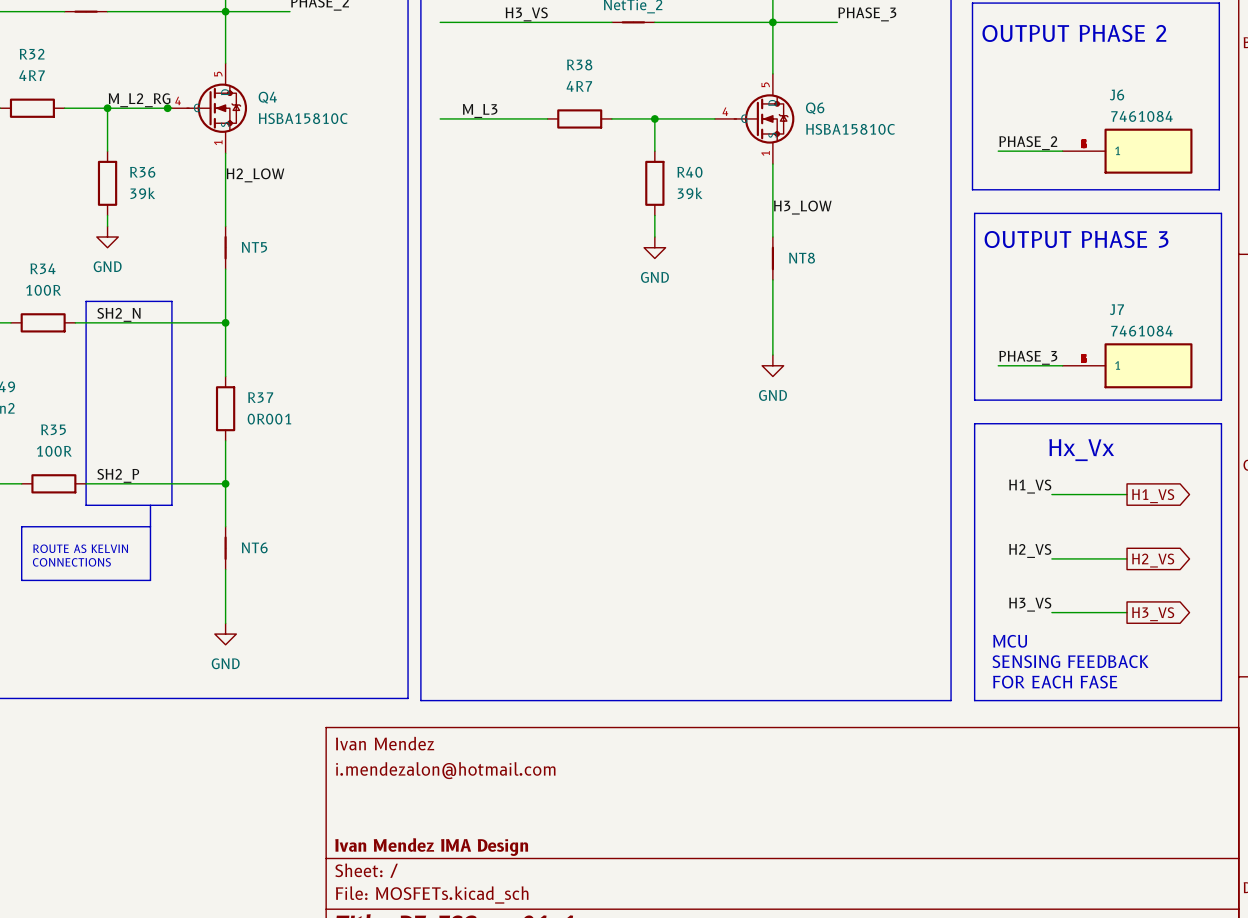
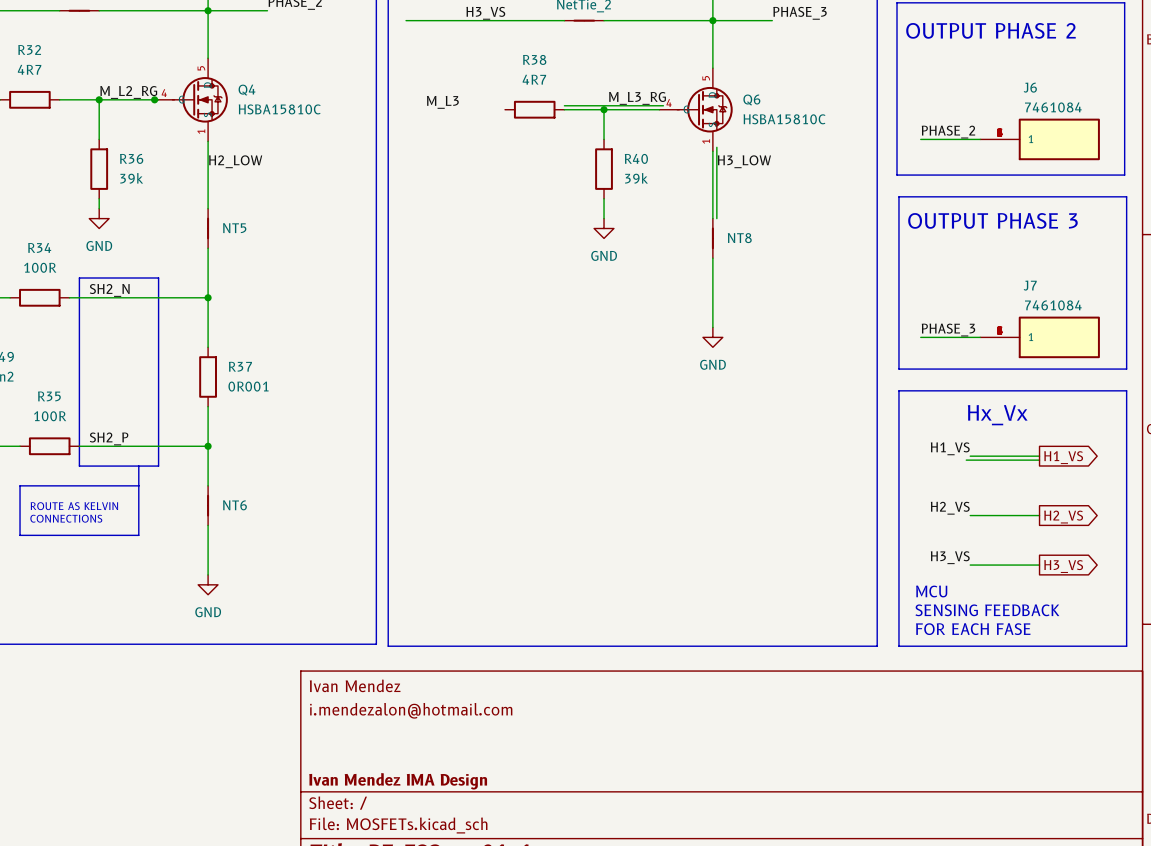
label: none -> M_L3_RG (637, 98)
wire: (440, 118) (547, 118) -> (564, 105) (663, 105)
wire: none -> (716, 147) (716, 218)
label position: H3_LOW (802, 207) -> H3_LOW (744, 161)
wire: none -> (966, 460) (1039, 460)

